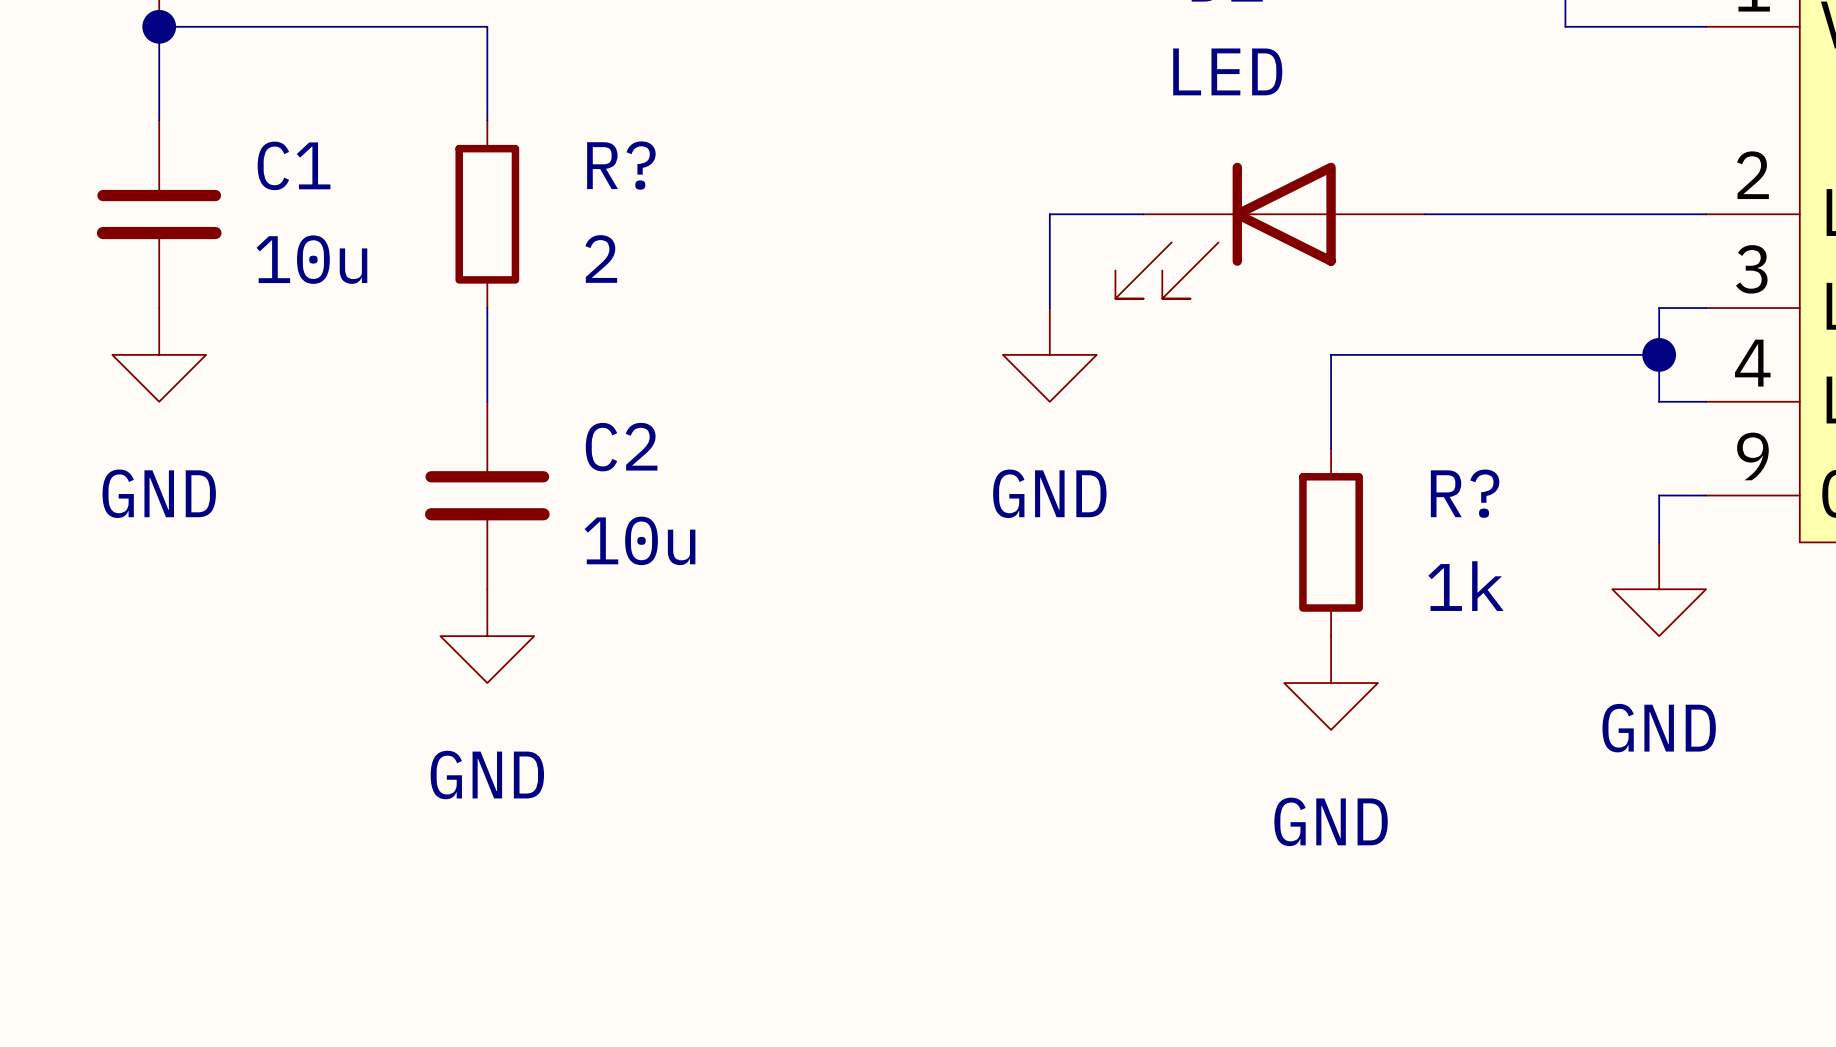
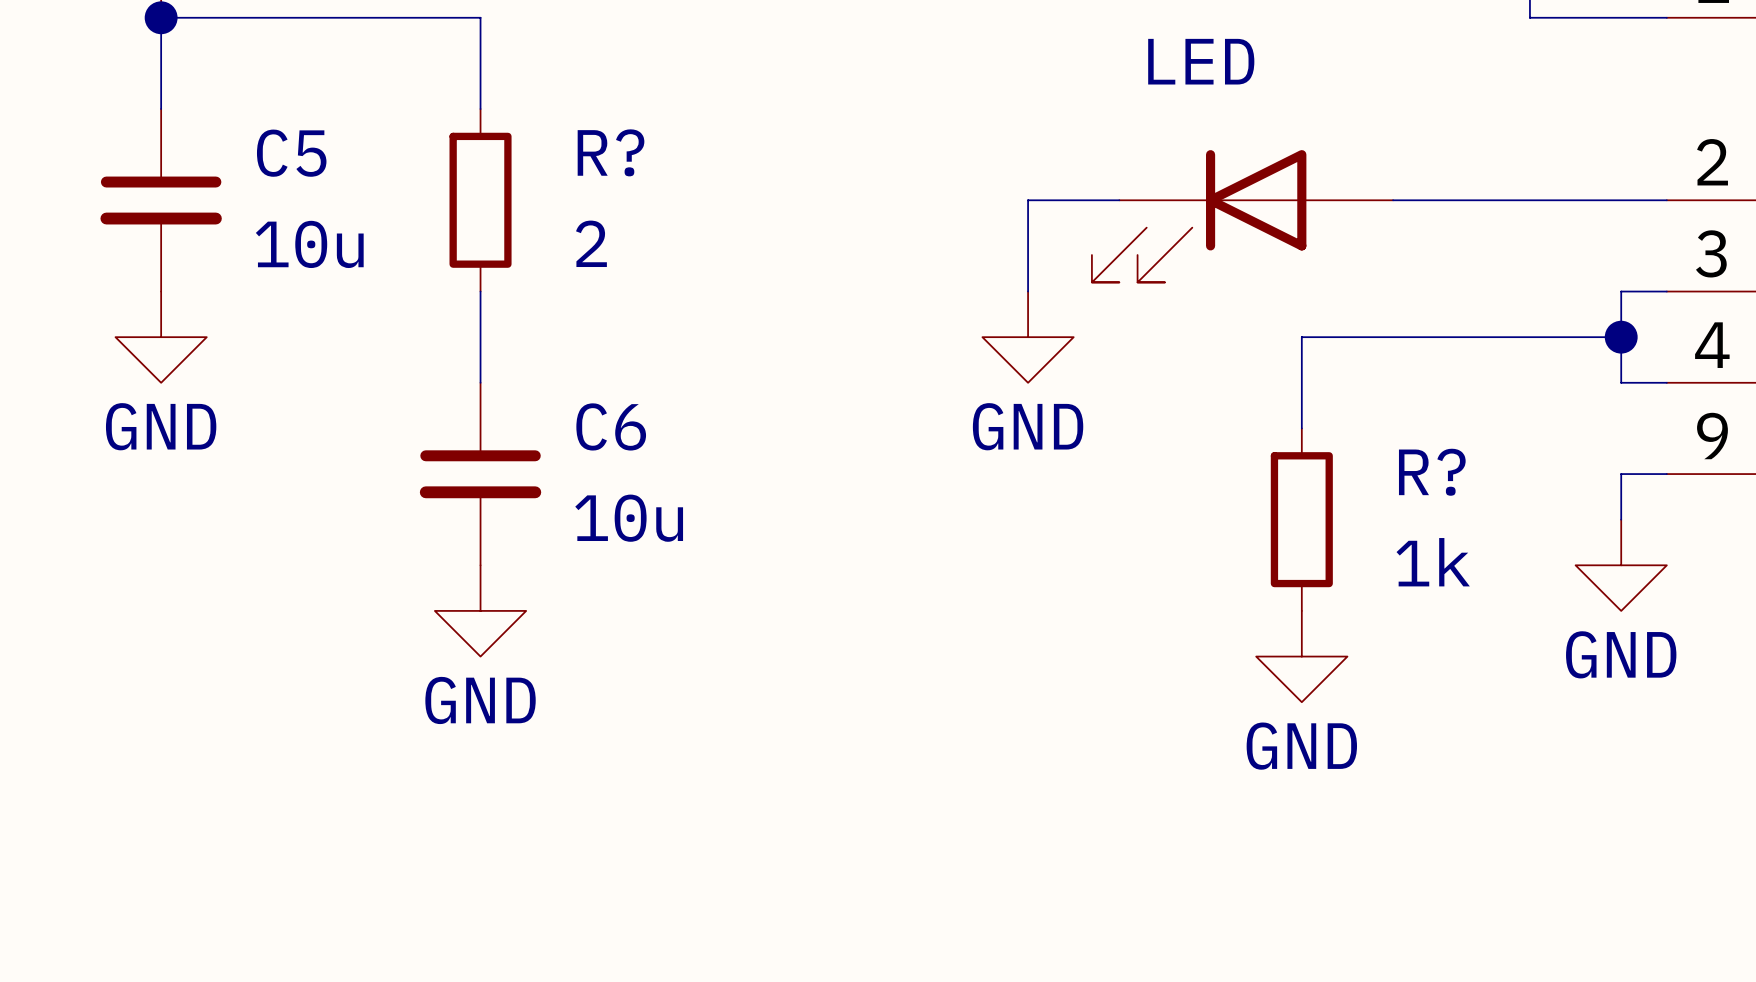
C1 name: C1 (294, 165) -> C5 (291, 153)
C2 name: C2 (621, 447) -> C6 (611, 426)
power symbol text position: GND (159, 493) -> GND (161, 426)
power symbol text position: GND (1049, 493) -> GND (1028, 426)
power symbol text position: GND (1659, 728) -> GND (1621, 654)
power symbol text position: GND (487, 775) -> GND (480, 700)
power symbol text position: GND (1331, 821) -> GND (1301, 746)

